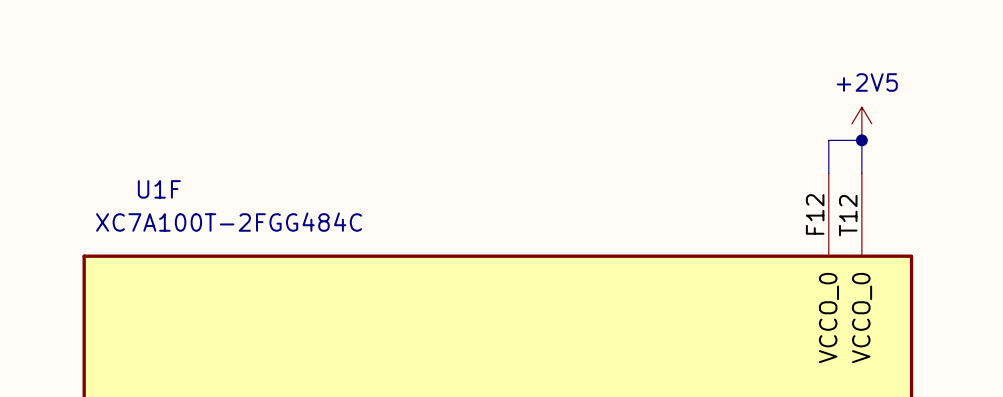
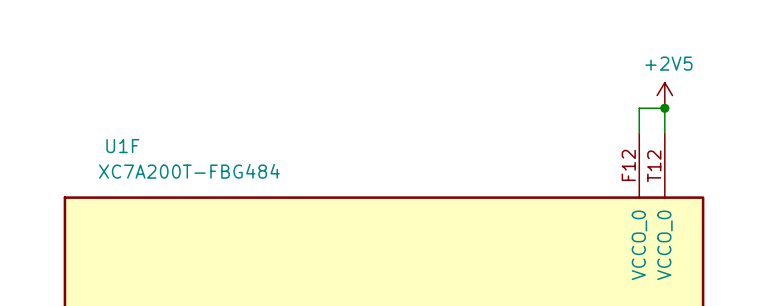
U1F value: XC7A100T-2FGG484C (229, 222) -> XC7A200T-FBG484 (189, 171)

